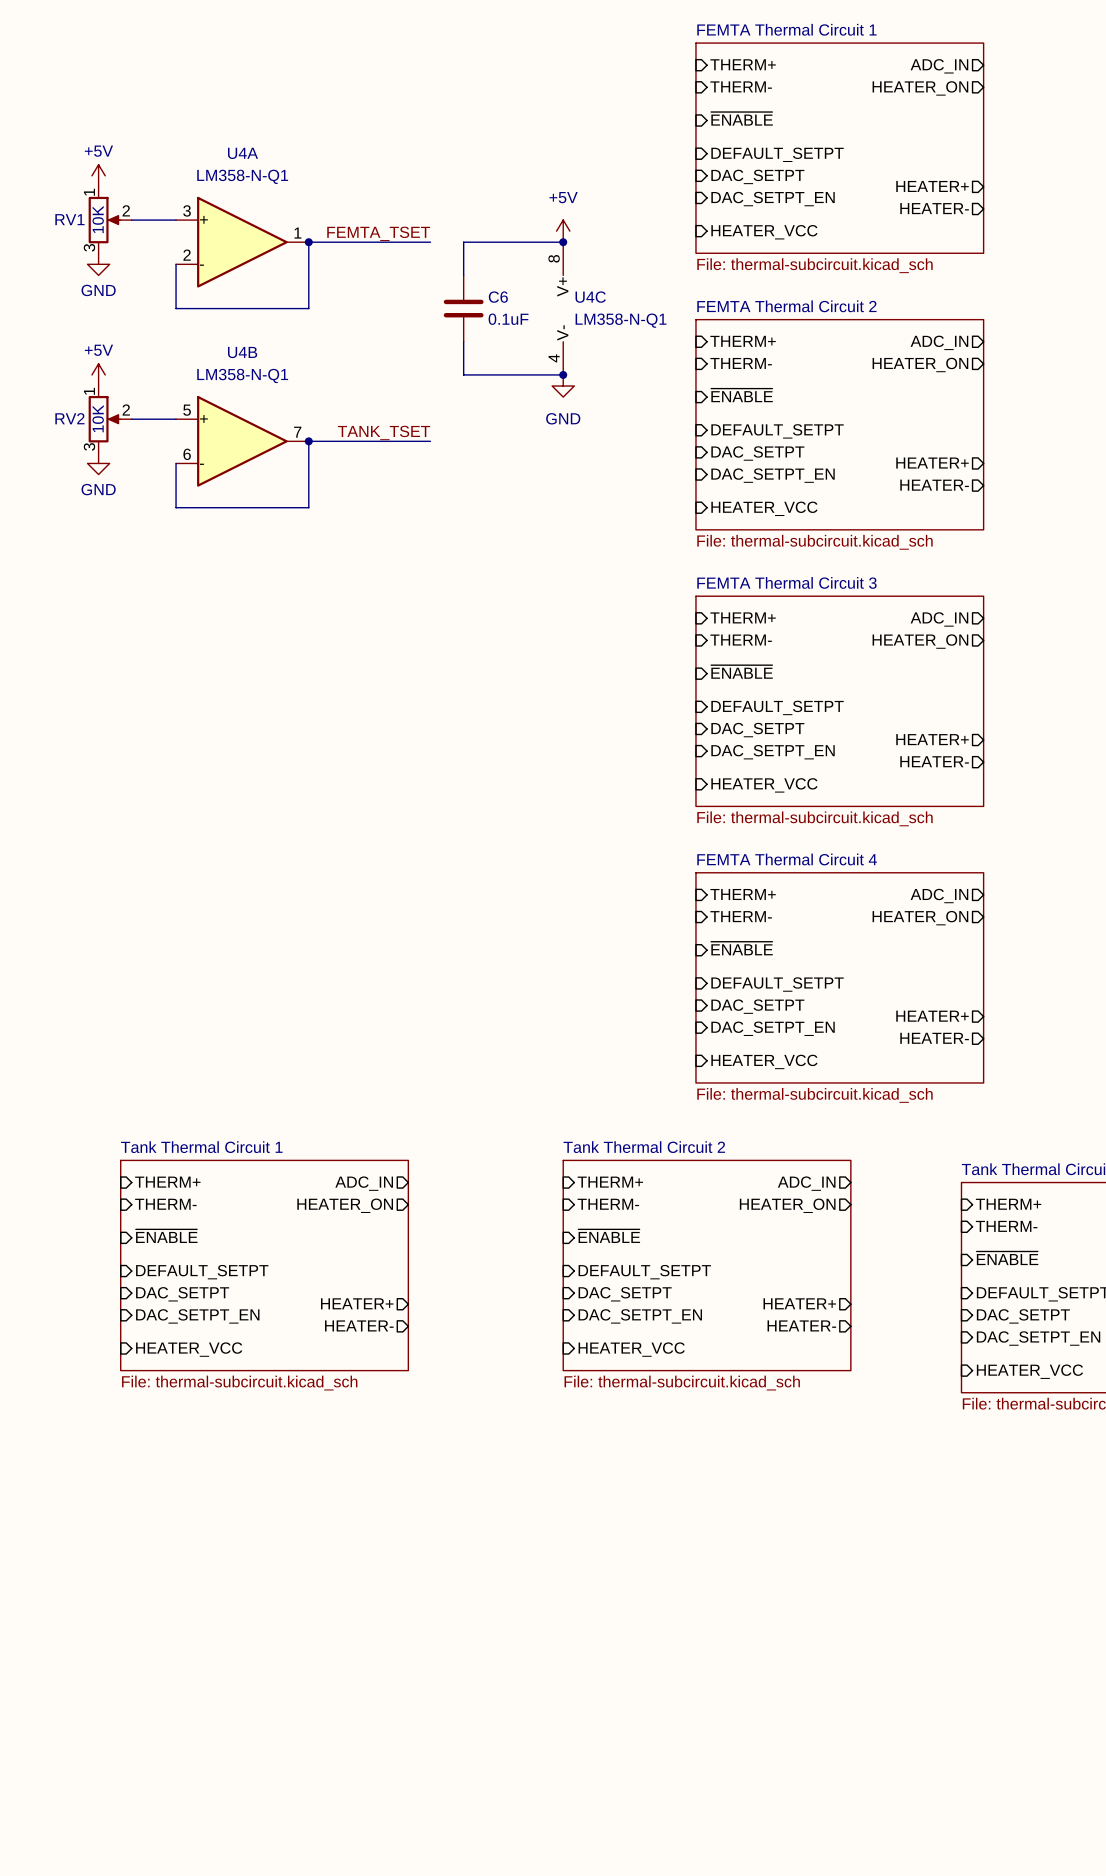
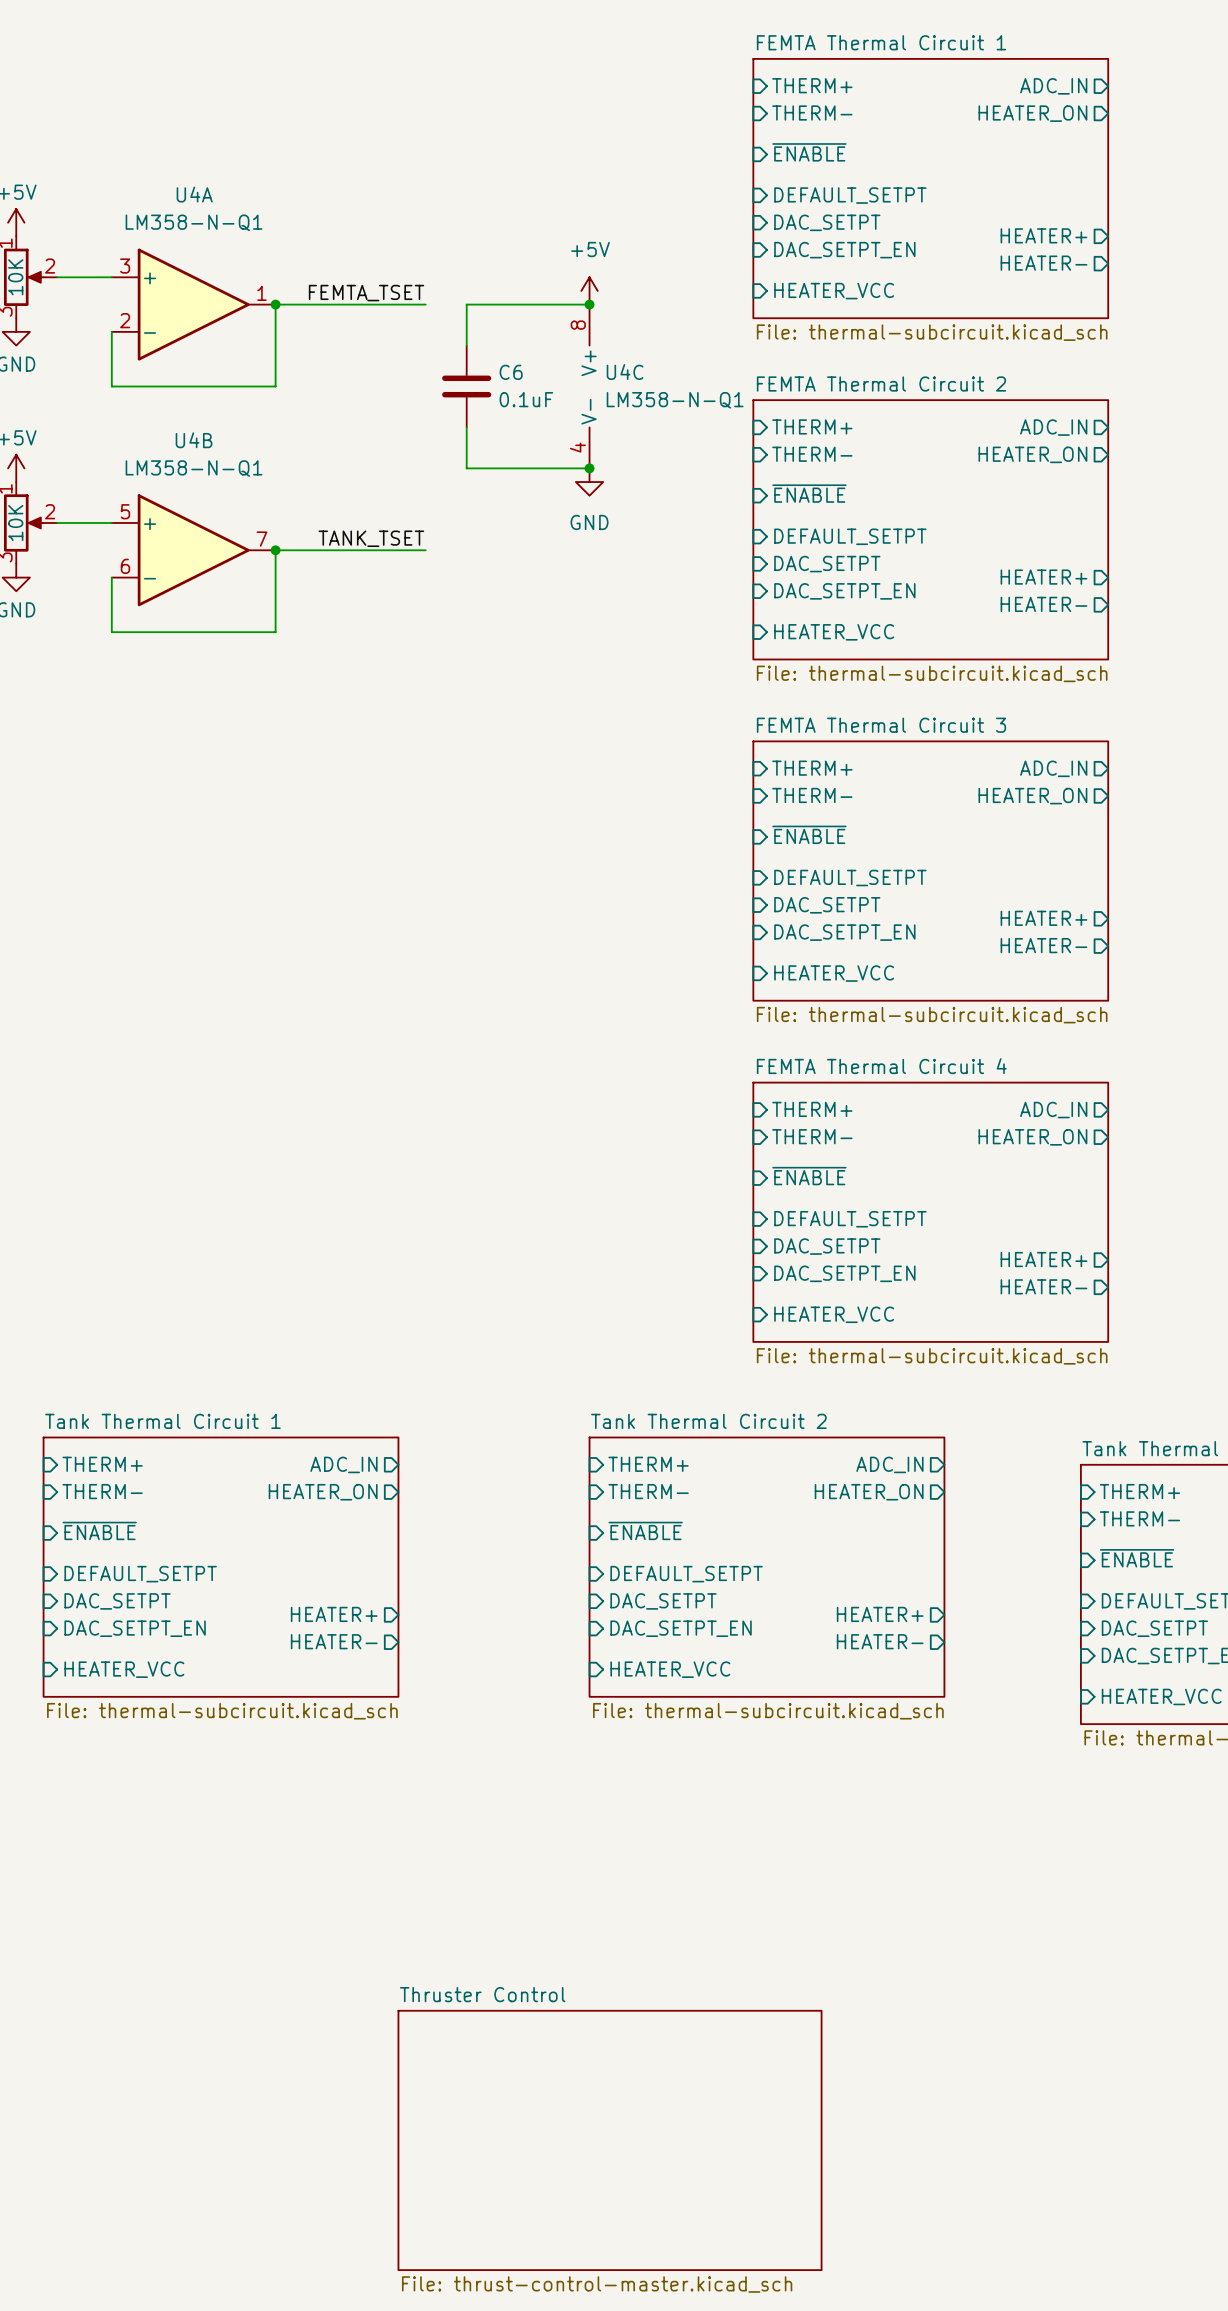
sheet Thruster Control: none -> File: thrust-control-master.kicad_sch (610, 2140)

